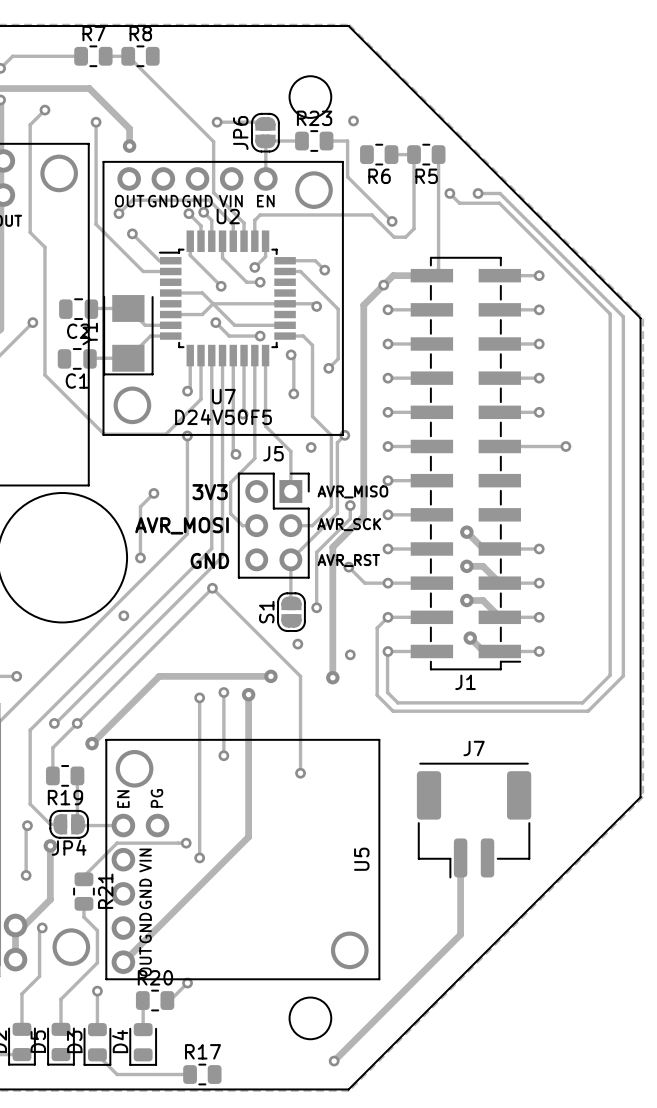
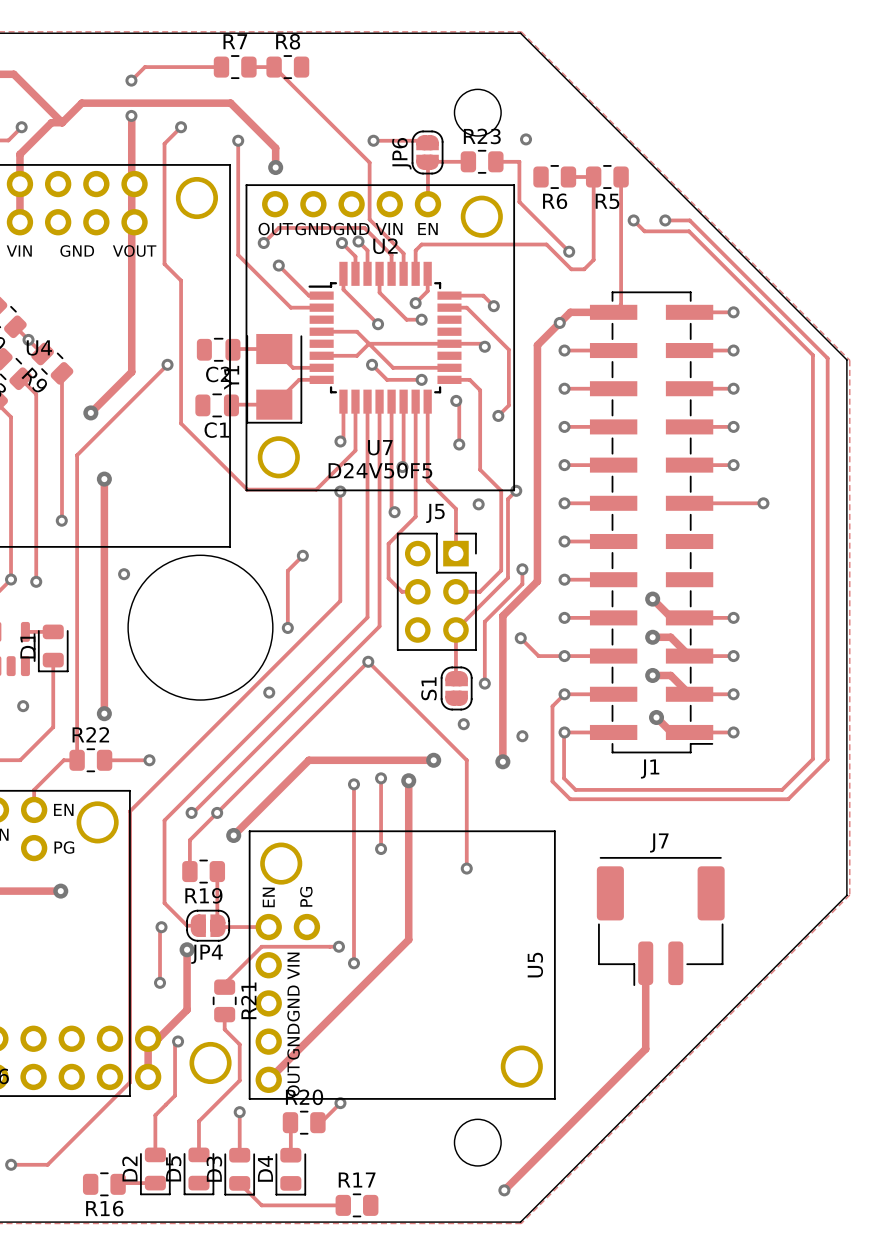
text: AVR_MISO (352, 491) -> none
text: 3V3 (210, 492) -> none
text: AVR_SCK (349, 524) -> none
text: AVR_MOSI (182, 525) -> none
text: GND (209, 560) -> none
text: AVR_RST (348, 560) -> none

